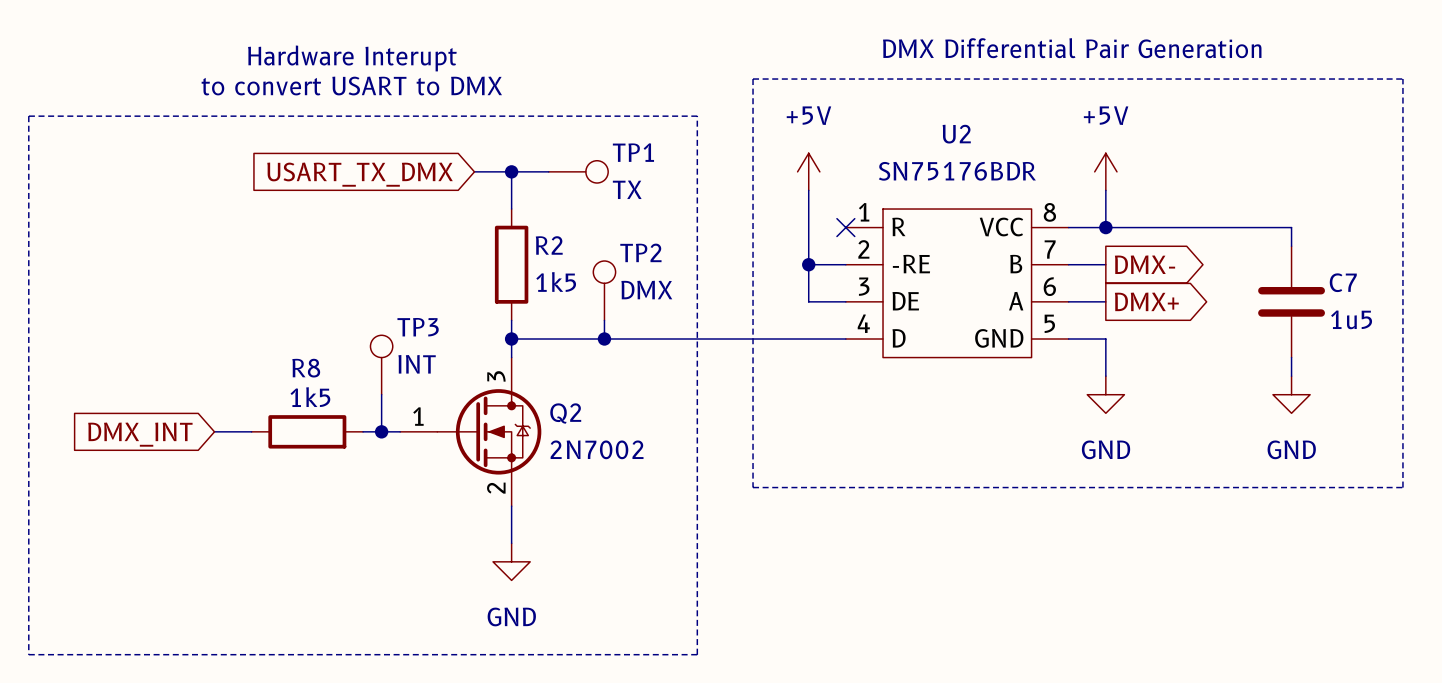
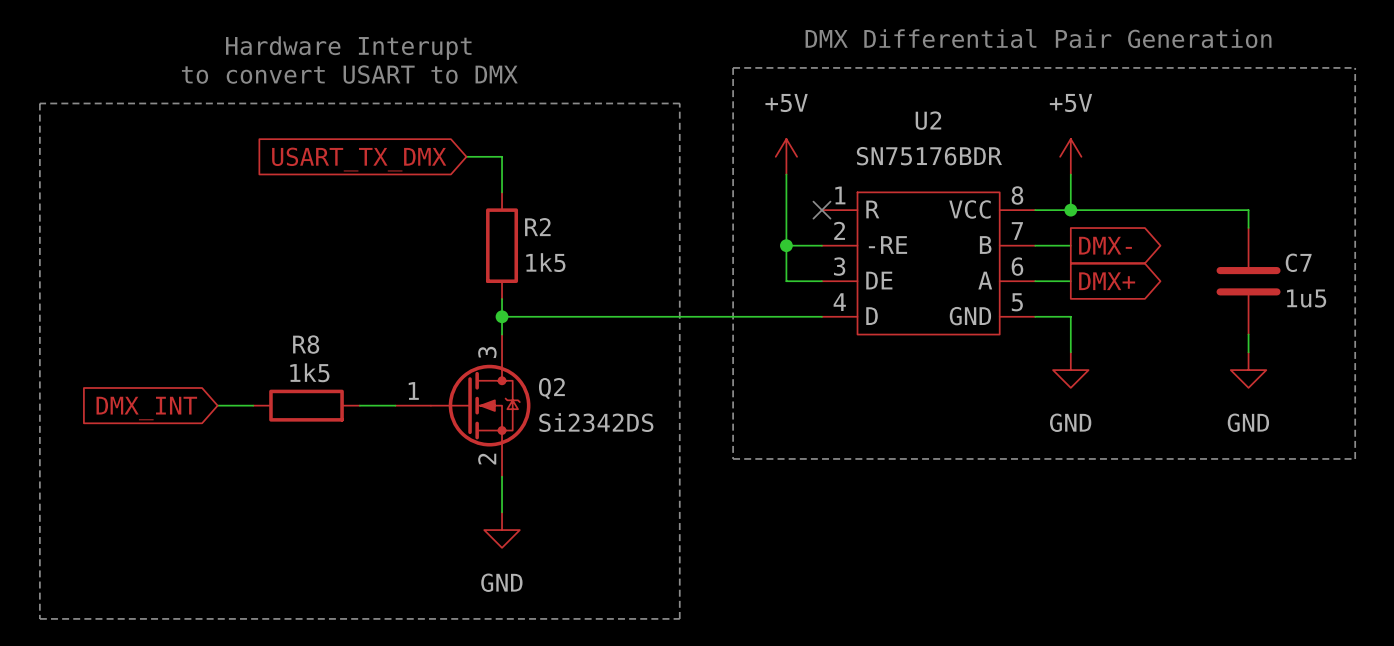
wire: (511, 171) (548, 171) -> none
junction: (511, 171) -> none
TP1: TX (578, 171) -> none
TP2: DMX (604, 290) -> none
wire: (604, 320) (604, 339) -> none
junction: (604, 339) -> none
TP3: INT (381, 365) -> none
wire: (381, 394) (381, 431) -> none
junction: (381, 431) -> none
Q2 value: 2N7002 (597, 449) -> Si2342DS (596, 422)

